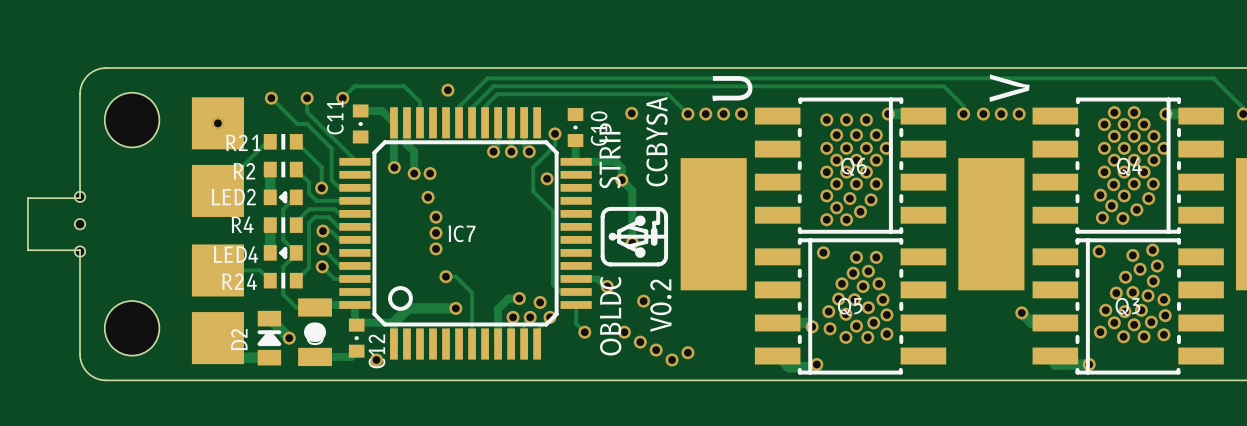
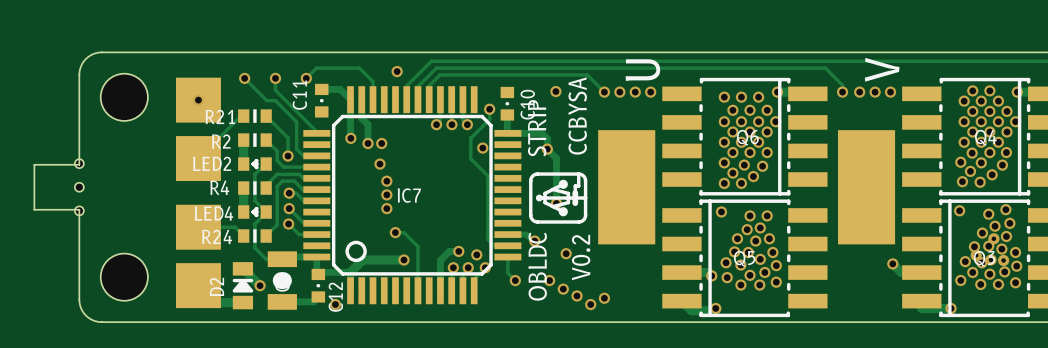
via: none -> (993, 238)
via: none -> (976, 255)
via: none -> (991, 259)
via: none -> (1003, 260)
via: (1141, 310) -> none

